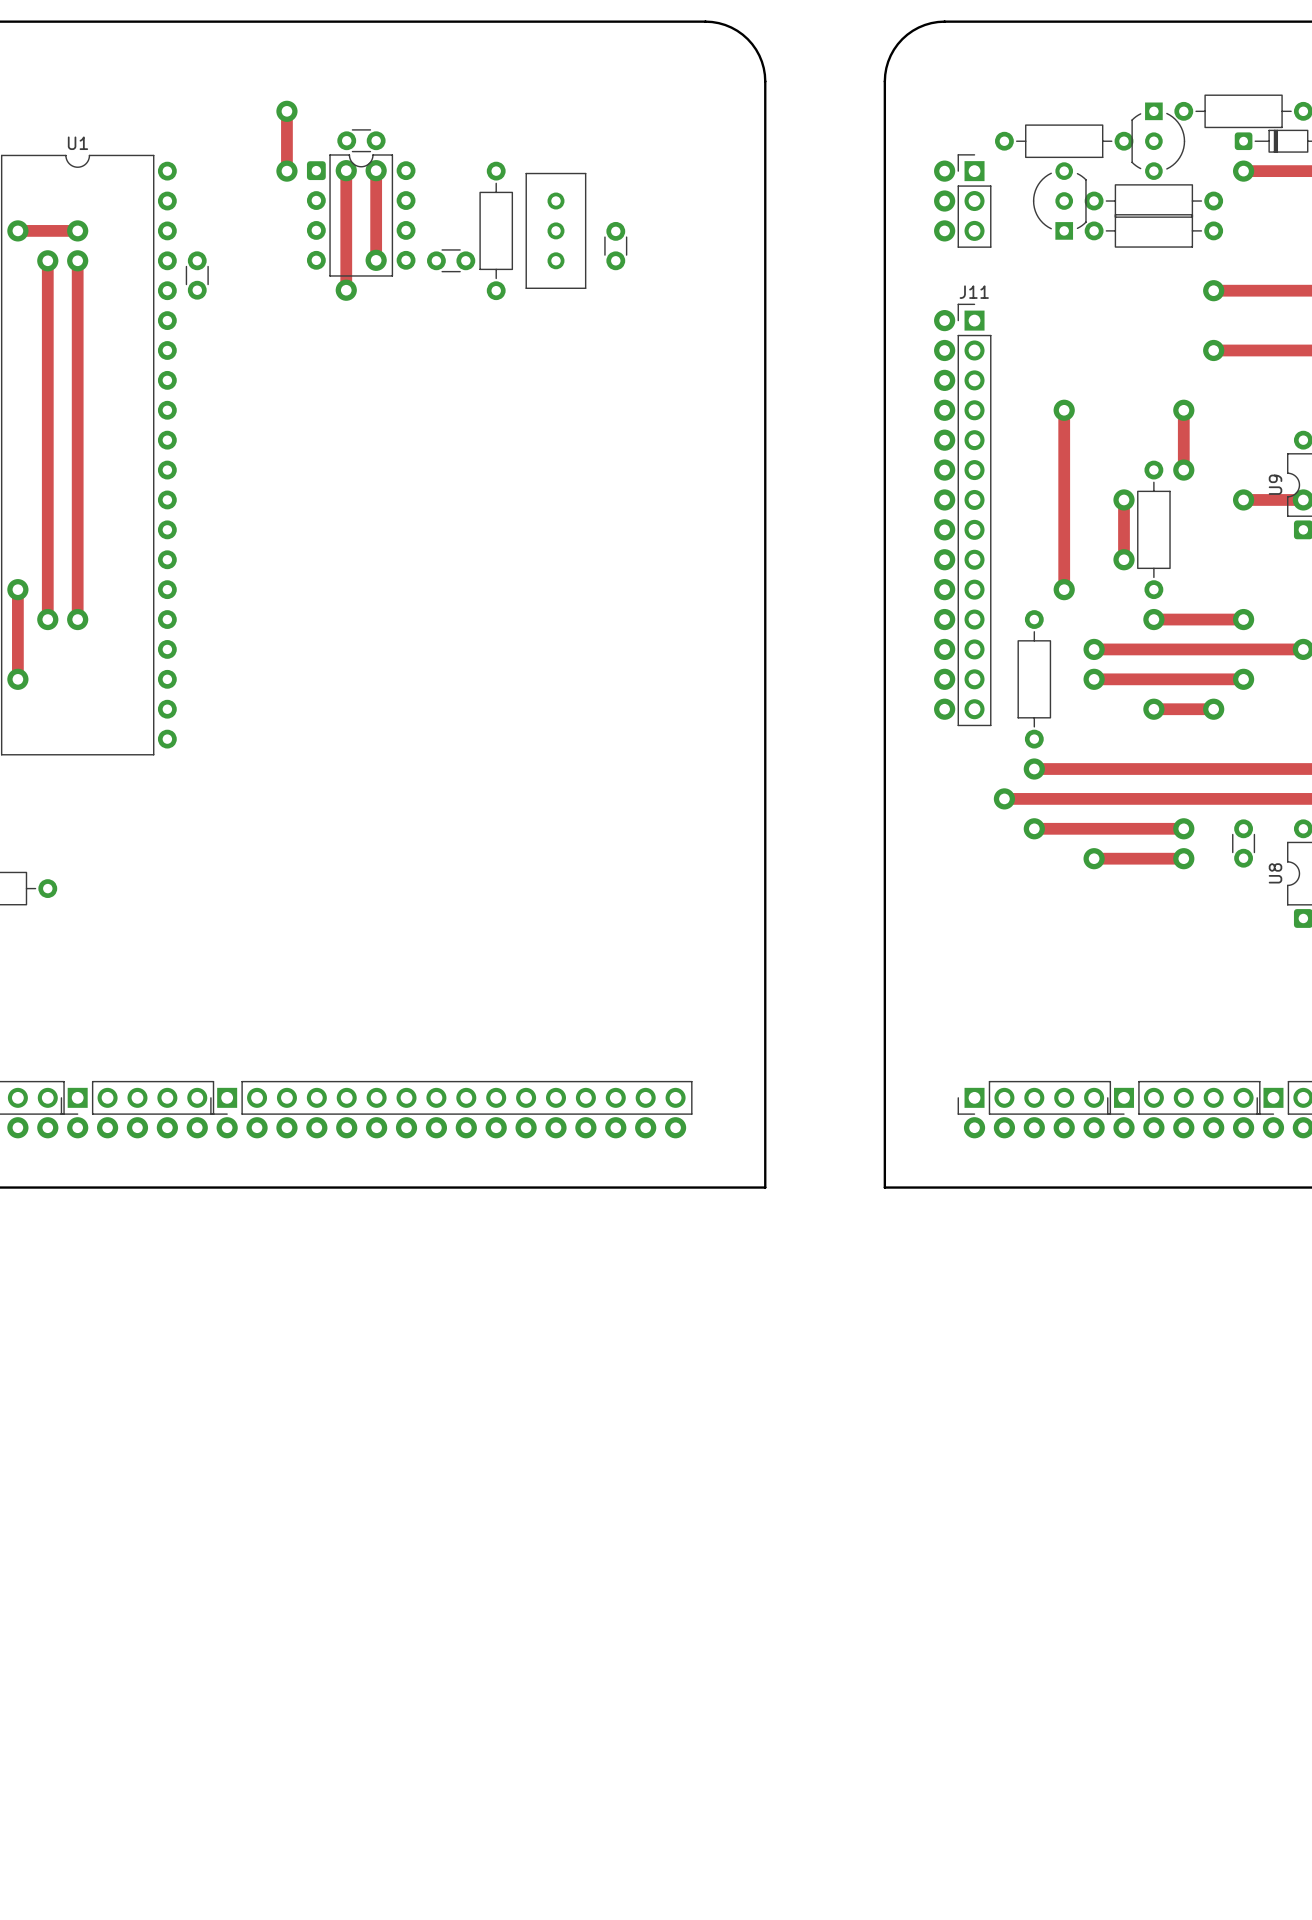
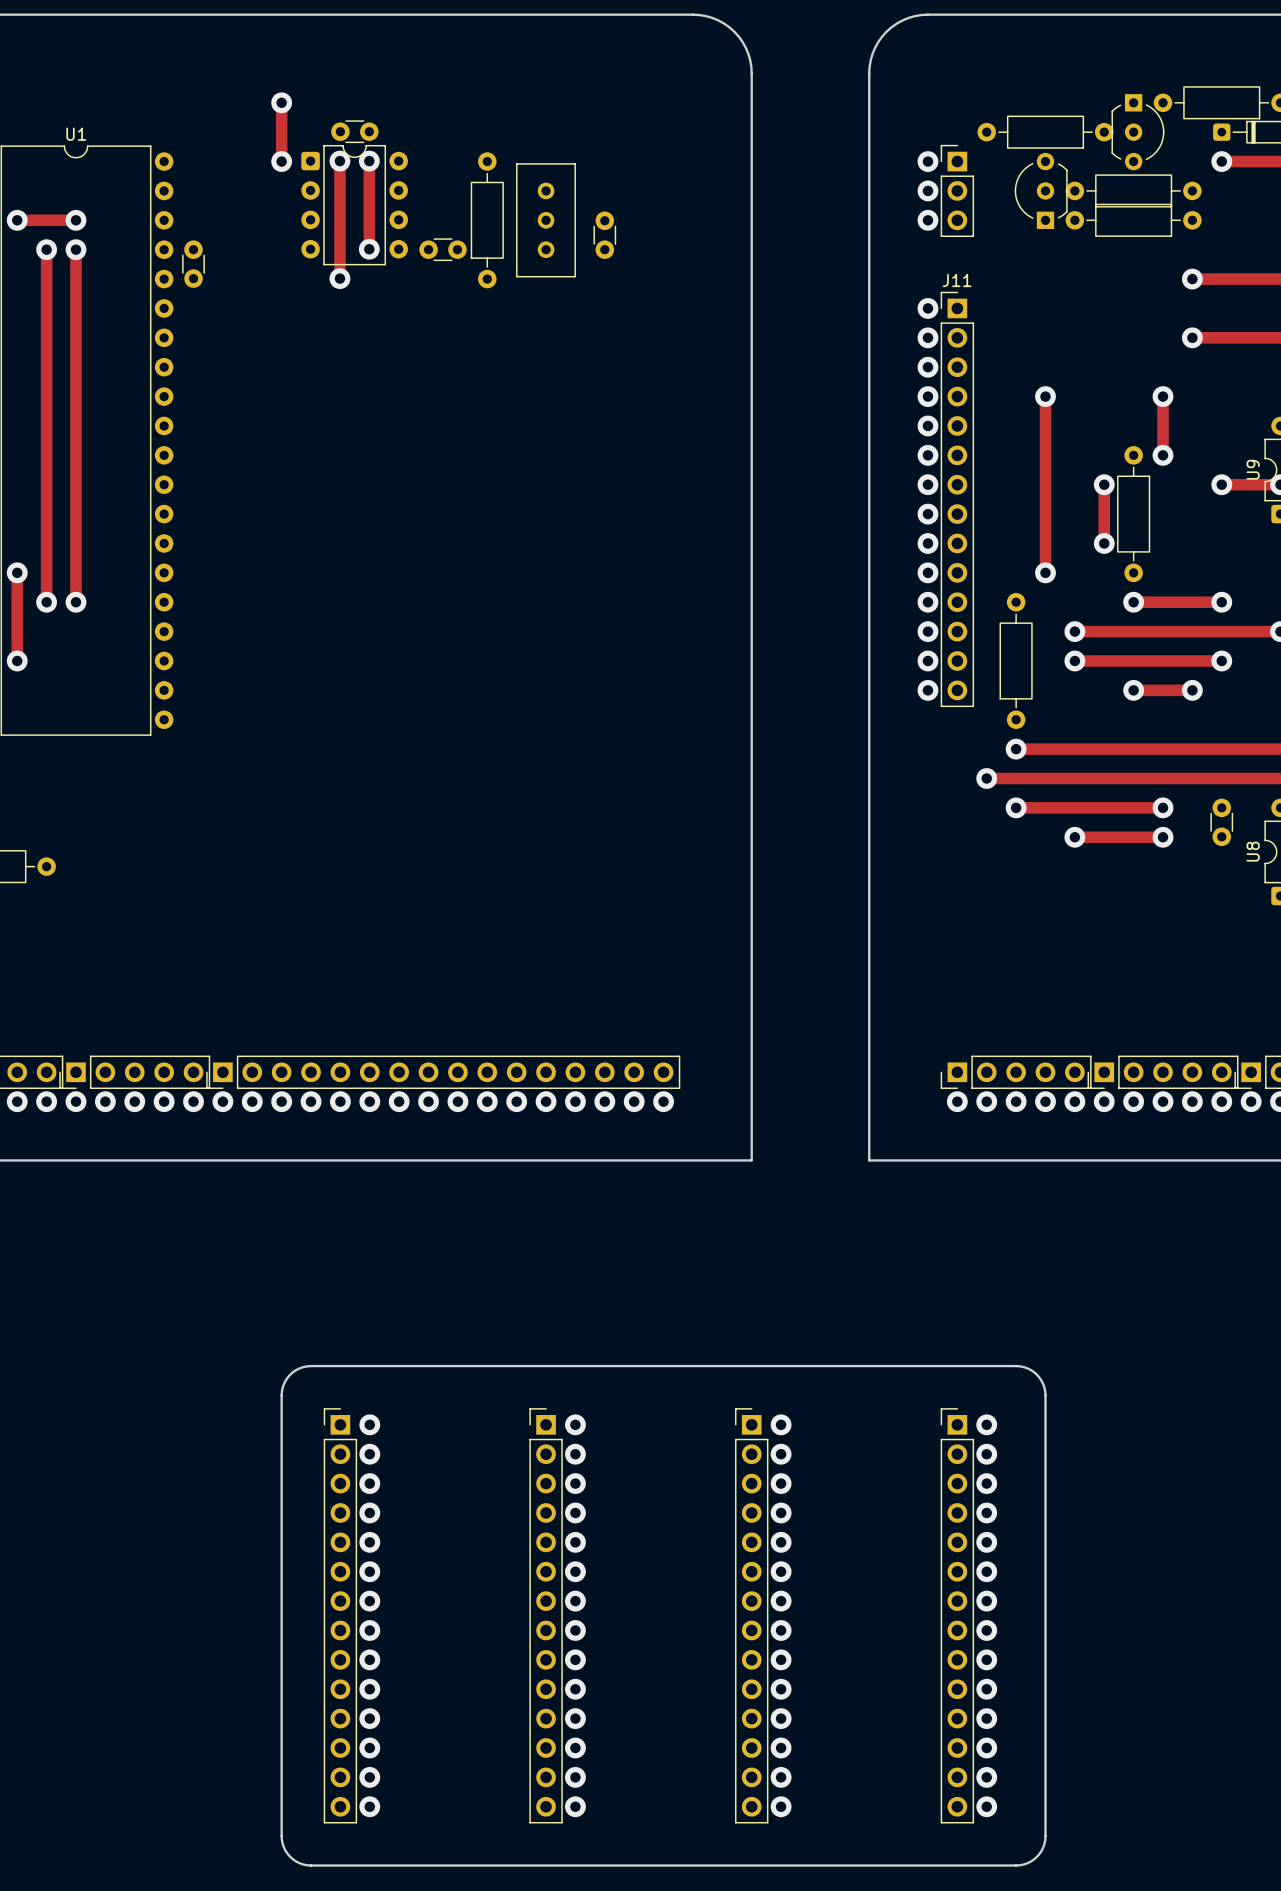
board edge: none -> (311, 1366) (1016, 1366) (1030, 1370) (1041, 1380) (1045, 1395) (1045, 1836) (1041, 1850) (1030, 1861) (1016, 1865) (311, 1865) (296, 1861) (285, 1850) (281, 1836) (281, 1395) (283, 1384) (290, 1374) (299, 1368) (311, 1366)
via: none -> (369, 1424)
via: none -> (575, 1424)
via: none -> (781, 1424)
via: none -> (986, 1424)
via: none -> (369, 1454)
via: none -> (575, 1454)
via: none -> (781, 1454)
via: none -> (986, 1454)
via: none -> (369, 1483)
via: none -> (575, 1483)
via: none -> (781, 1483)
via: none -> (986, 1483)
via: none -> (369, 1512)
via: none -> (575, 1512)
via: none -> (781, 1512)
via: none -> (986, 1512)
via: none -> (369, 1542)
via: none -> (575, 1542)
via: none -> (781, 1542)
via: none -> (986, 1542)
via: none -> (369, 1571)
via: none -> (575, 1571)
via: none -> (781, 1571)
via: none -> (986, 1571)
via: none -> (369, 1601)
via: none -> (575, 1601)
via: none -> (781, 1601)
via: none -> (986, 1601)
part: none -> (340, 1615)
part: none -> (546, 1615)
part: none -> (751, 1615)
part: none -> (957, 1615)
via: none -> (369, 1630)
via: none -> (575, 1630)
via: none -> (781, 1630)
via: none -> (986, 1630)
via: none -> (369, 1659)
via: none -> (575, 1659)
via: none -> (781, 1659)
via: none -> (986, 1659)
via: none -> (369, 1689)
via: none -> (575, 1689)
via: none -> (781, 1689)
via: none -> (986, 1689)
via: none -> (369, 1718)
via: none -> (575, 1718)
via: none -> (781, 1718)
via: none -> (986, 1718)
via: none -> (369, 1748)
via: none -> (575, 1748)
via: none -> (781, 1748)
via: none -> (986, 1748)
via: none -> (369, 1777)
via: none -> (575, 1777)
via: none -> (781, 1777)
via: none -> (986, 1777)
via: none -> (369, 1806)
via: none -> (575, 1806)
via: none -> (781, 1806)
via: none -> (986, 1806)

